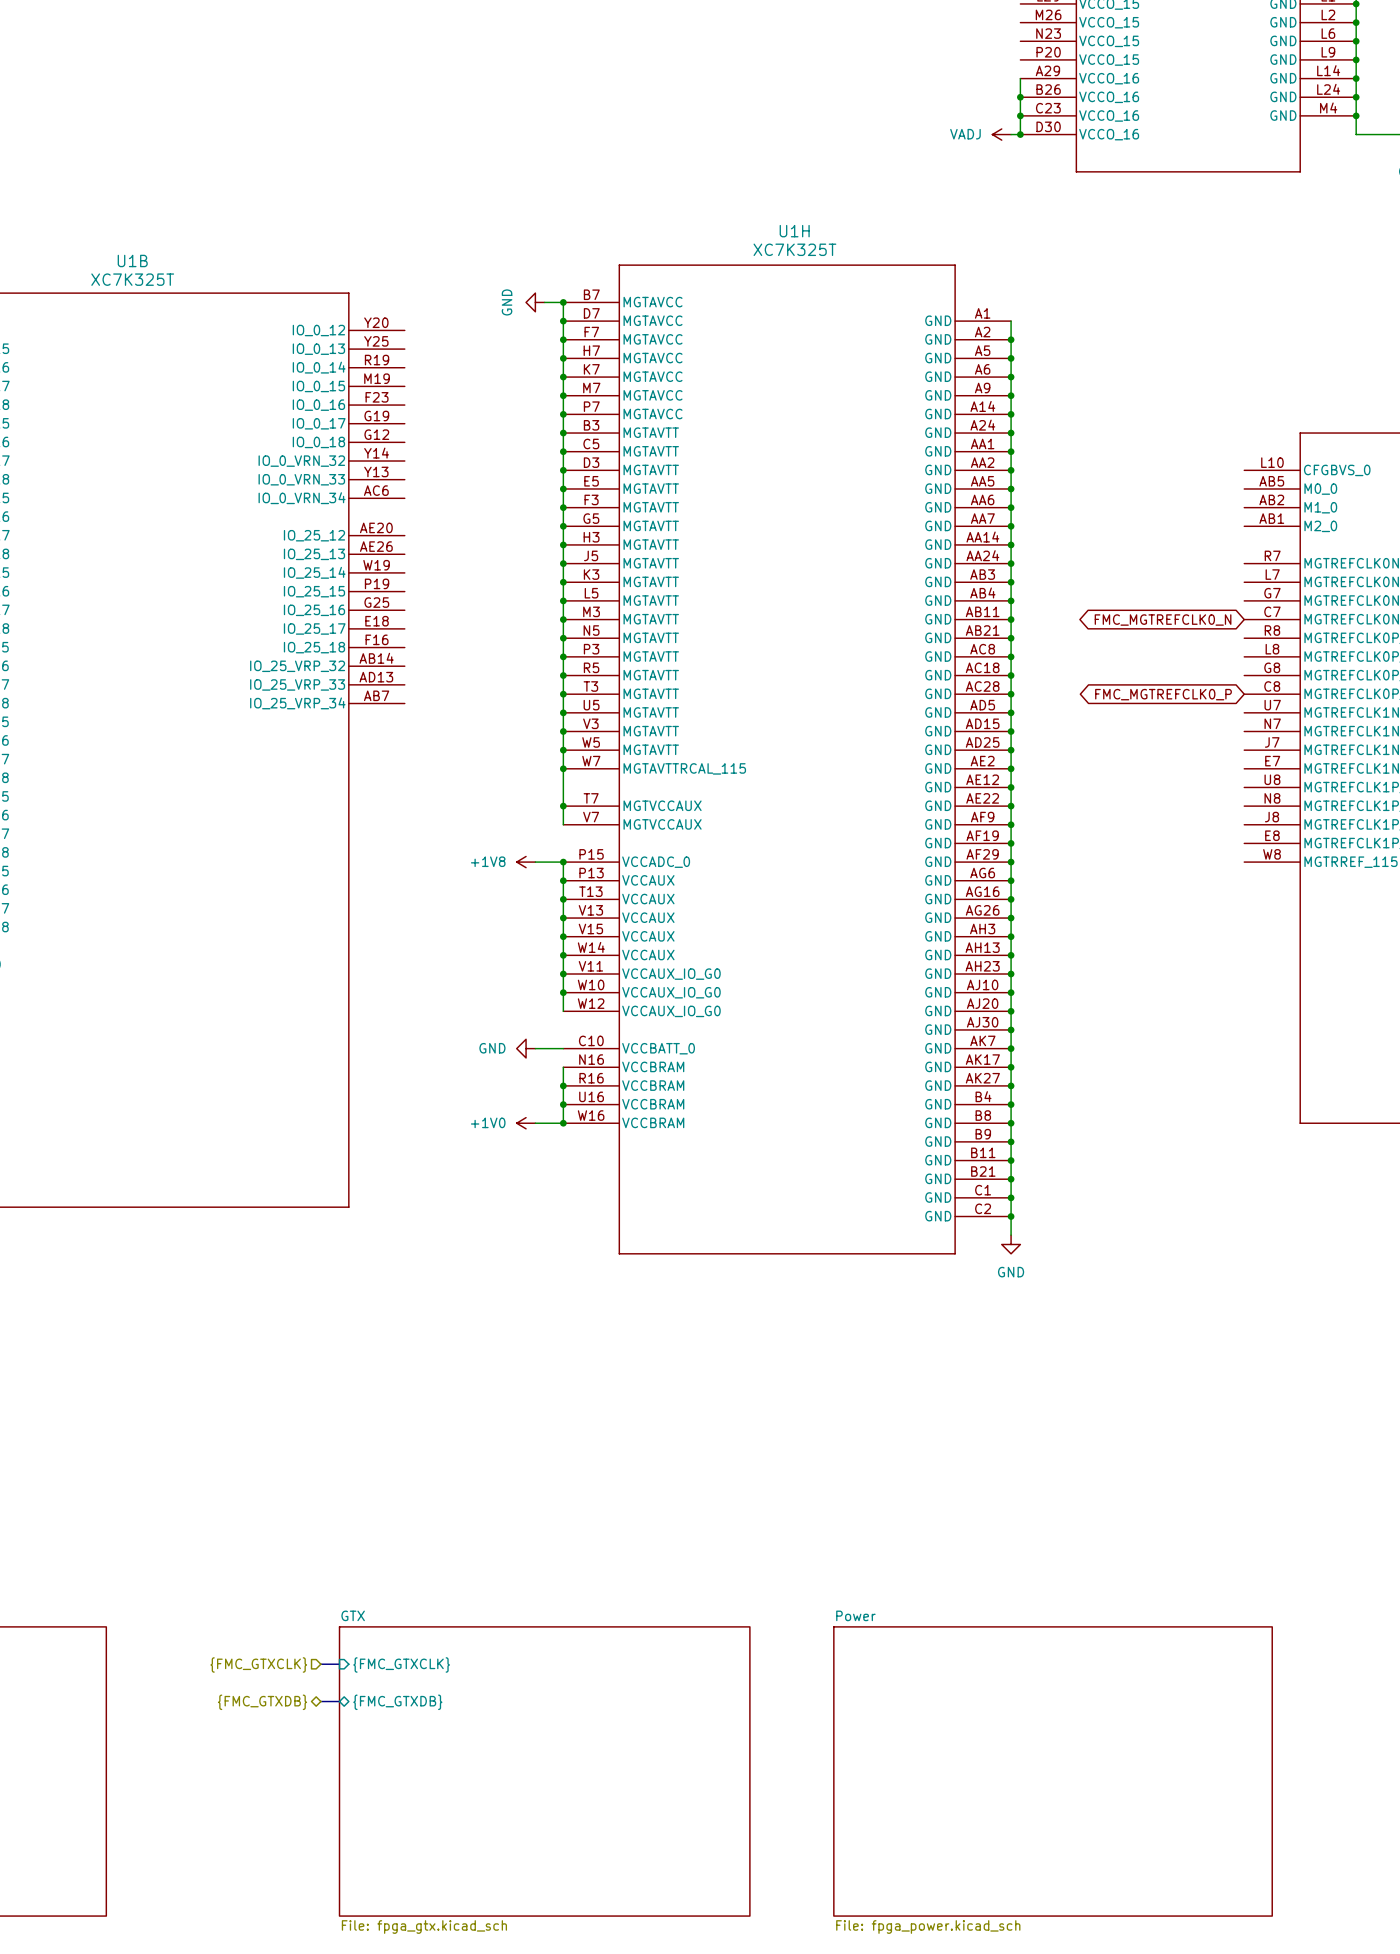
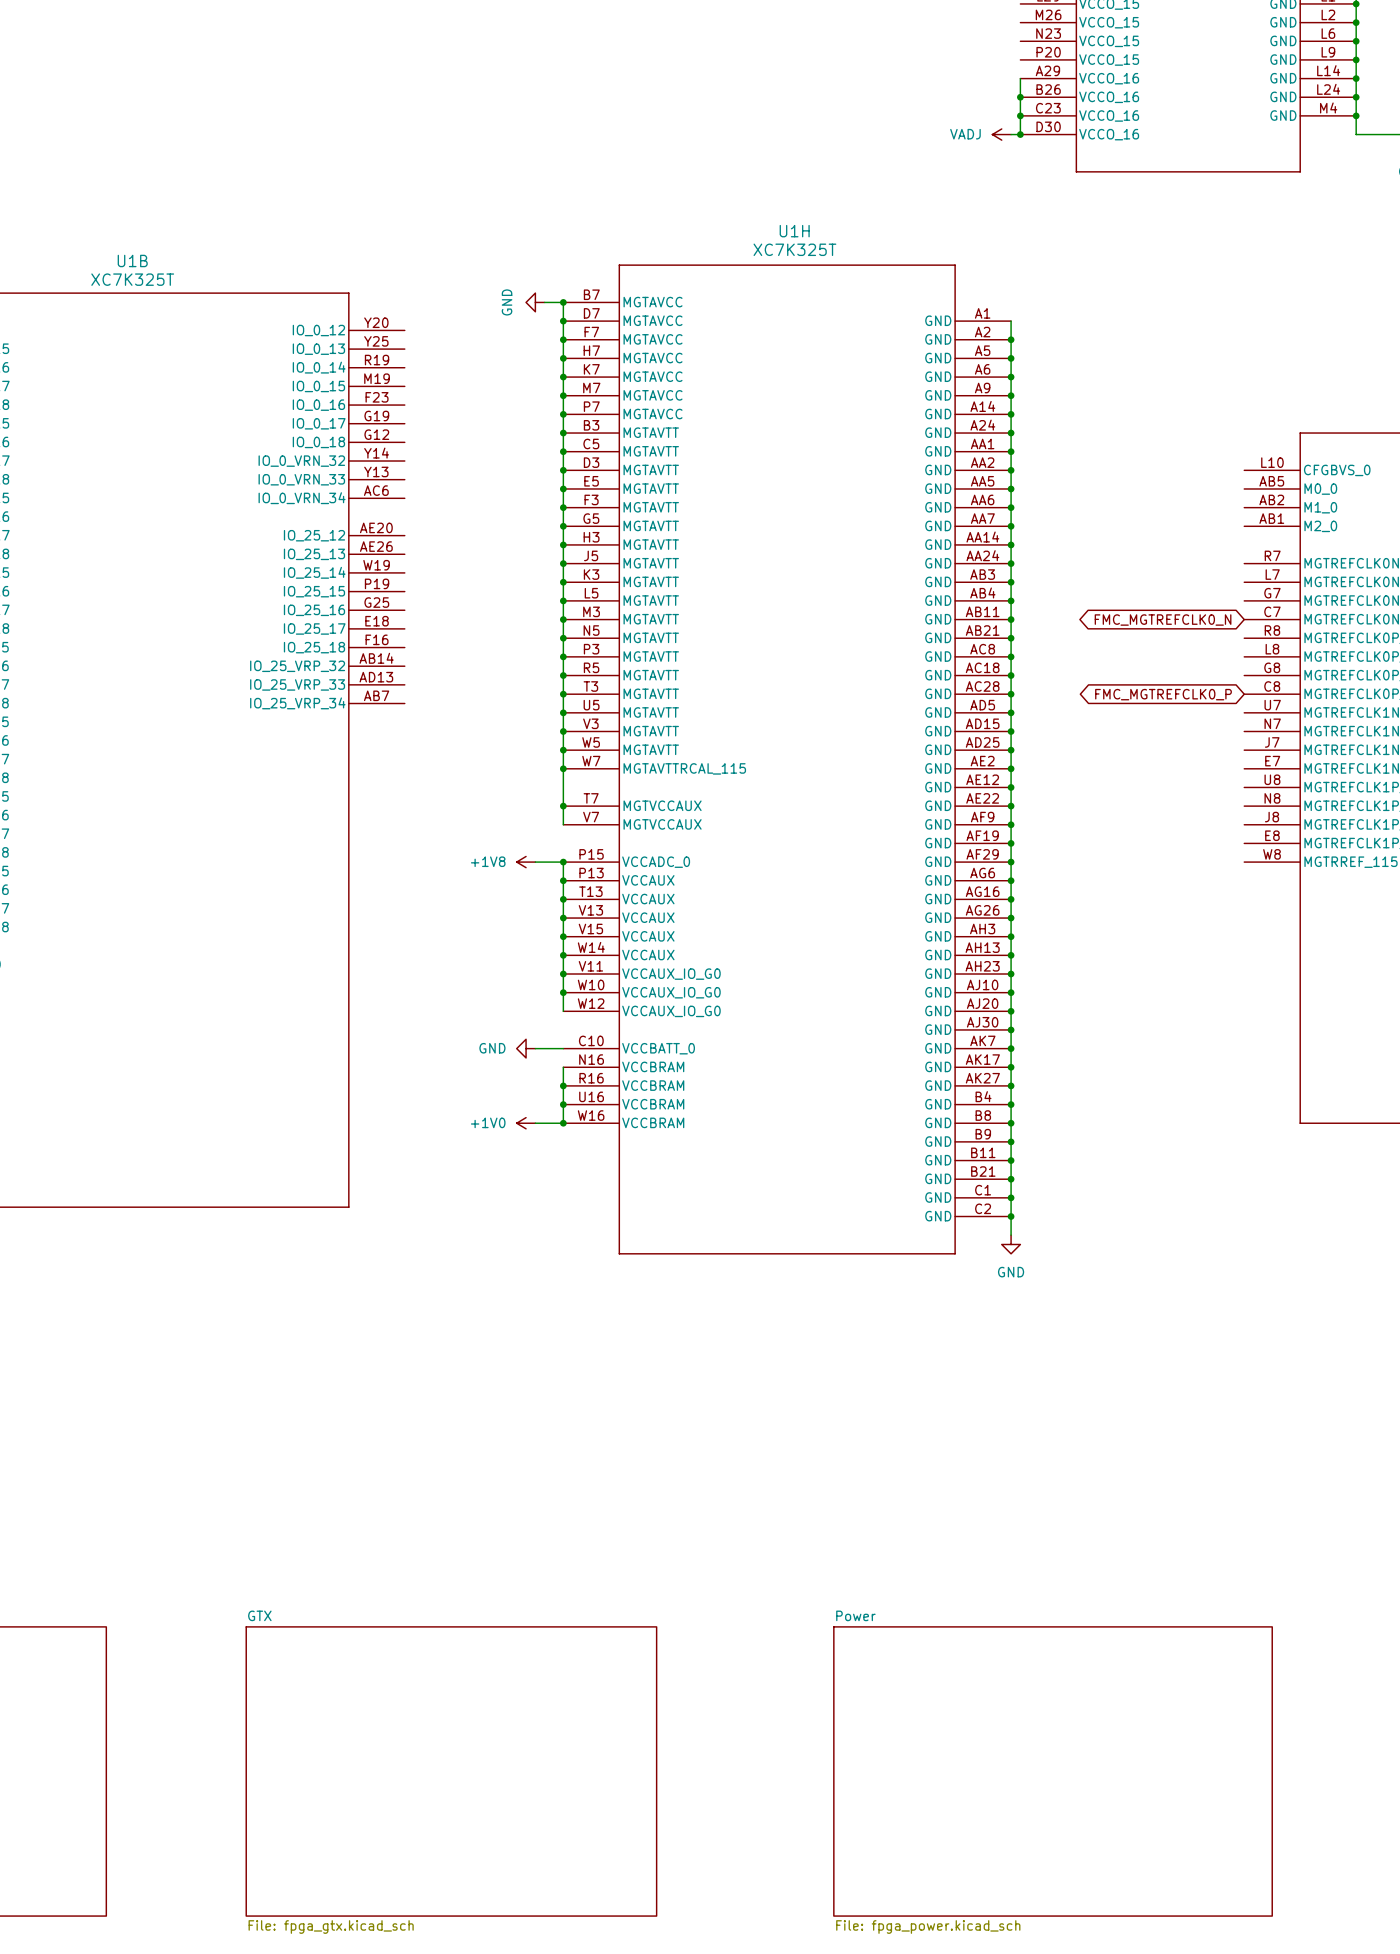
hierarchical label: {FMC_GTXCLK} (258, 1664) -> none
bus: (320, 1664) (339, 1664) -> none
sheet pin: {FMC_GTXCLK} (401, 1664) -> none
bus: (320, 1701) (339, 1701) -> none
hierarchical label: {FMC_GTXDB} (262, 1702) -> none
sheet pin: {FMC_GTXDB} (397, 1702) -> none
sheet GTX position: (544, 1771) -> (451, 1771)

